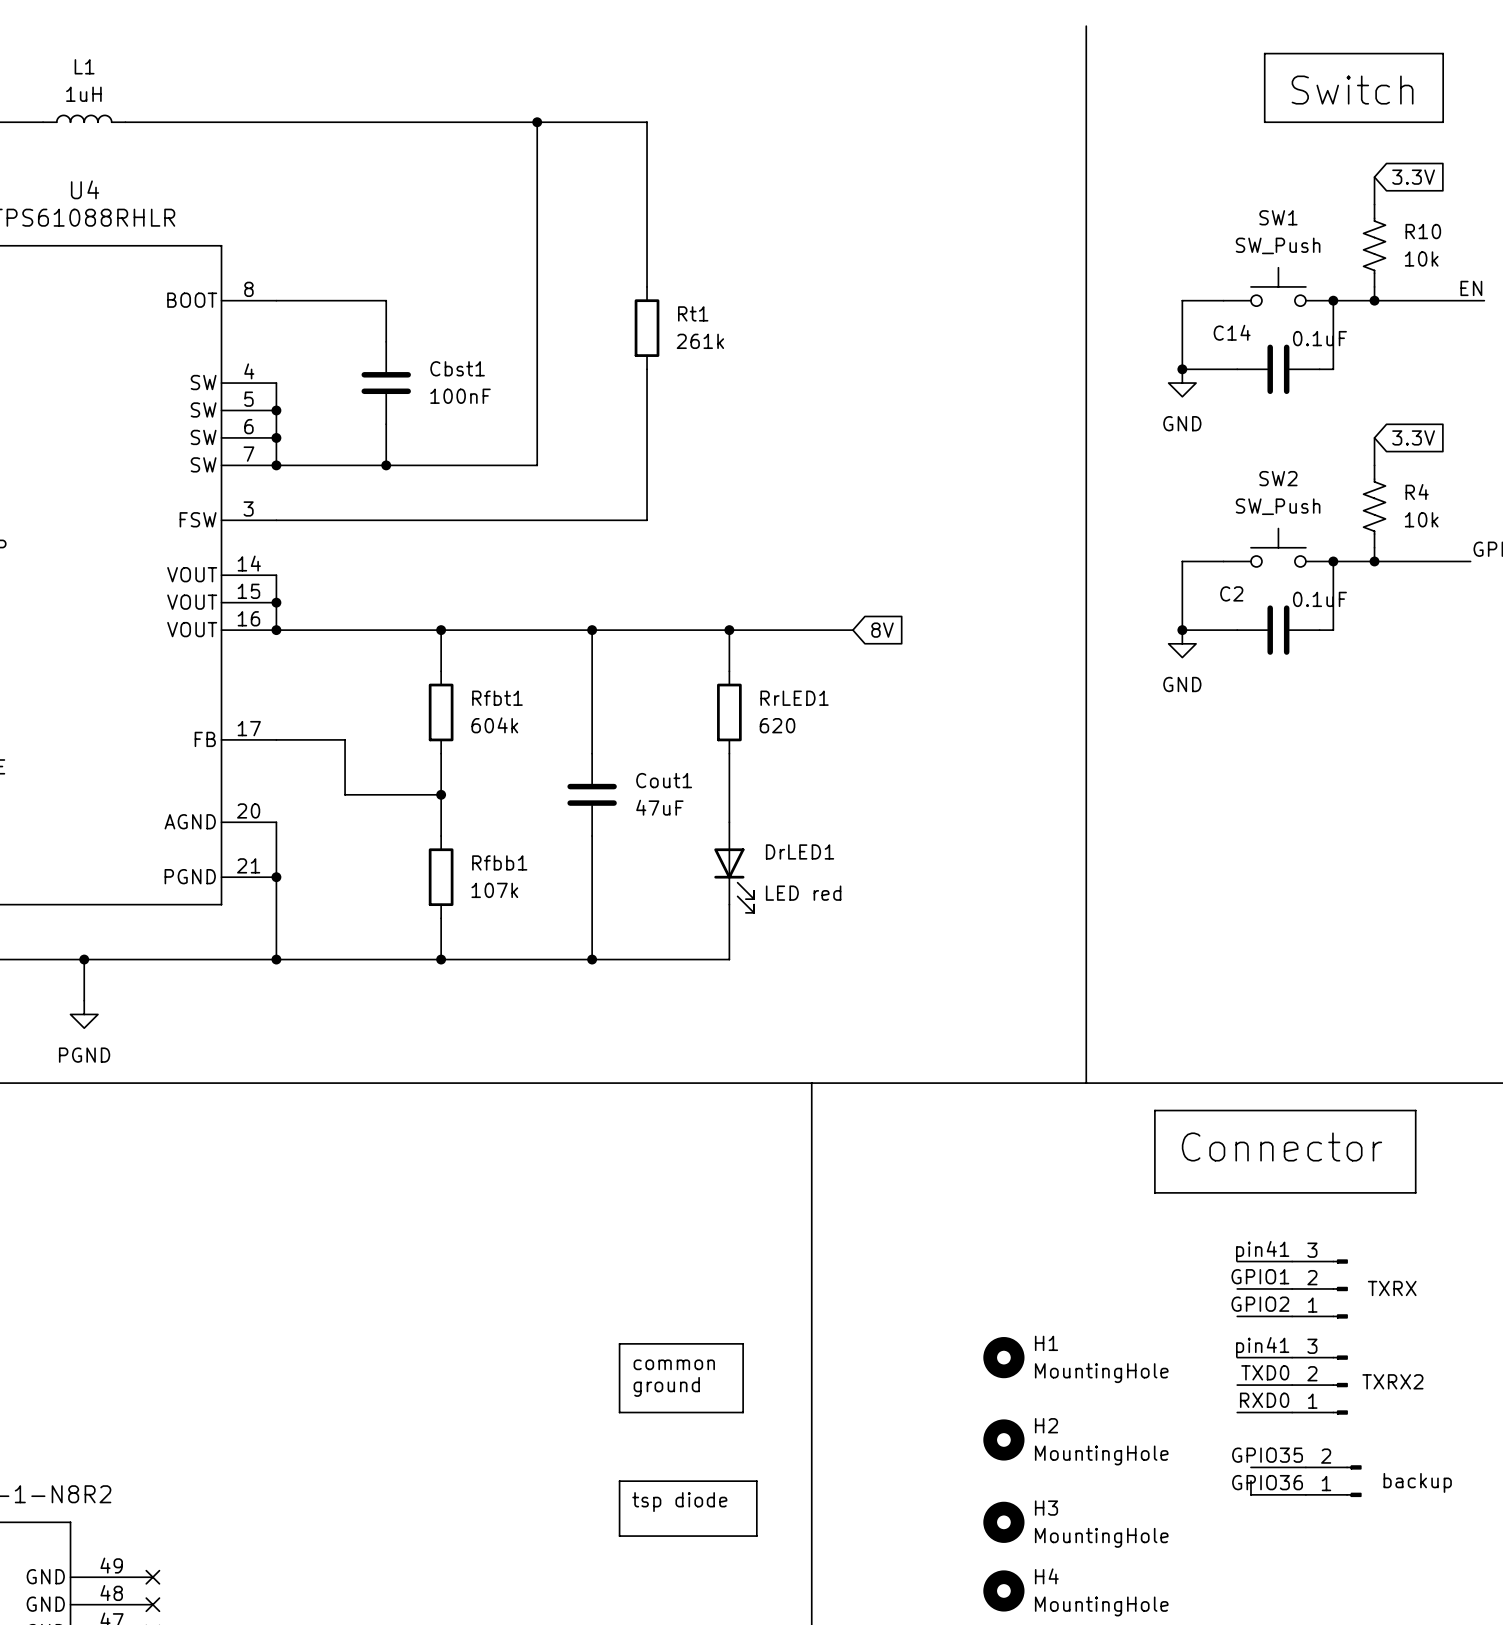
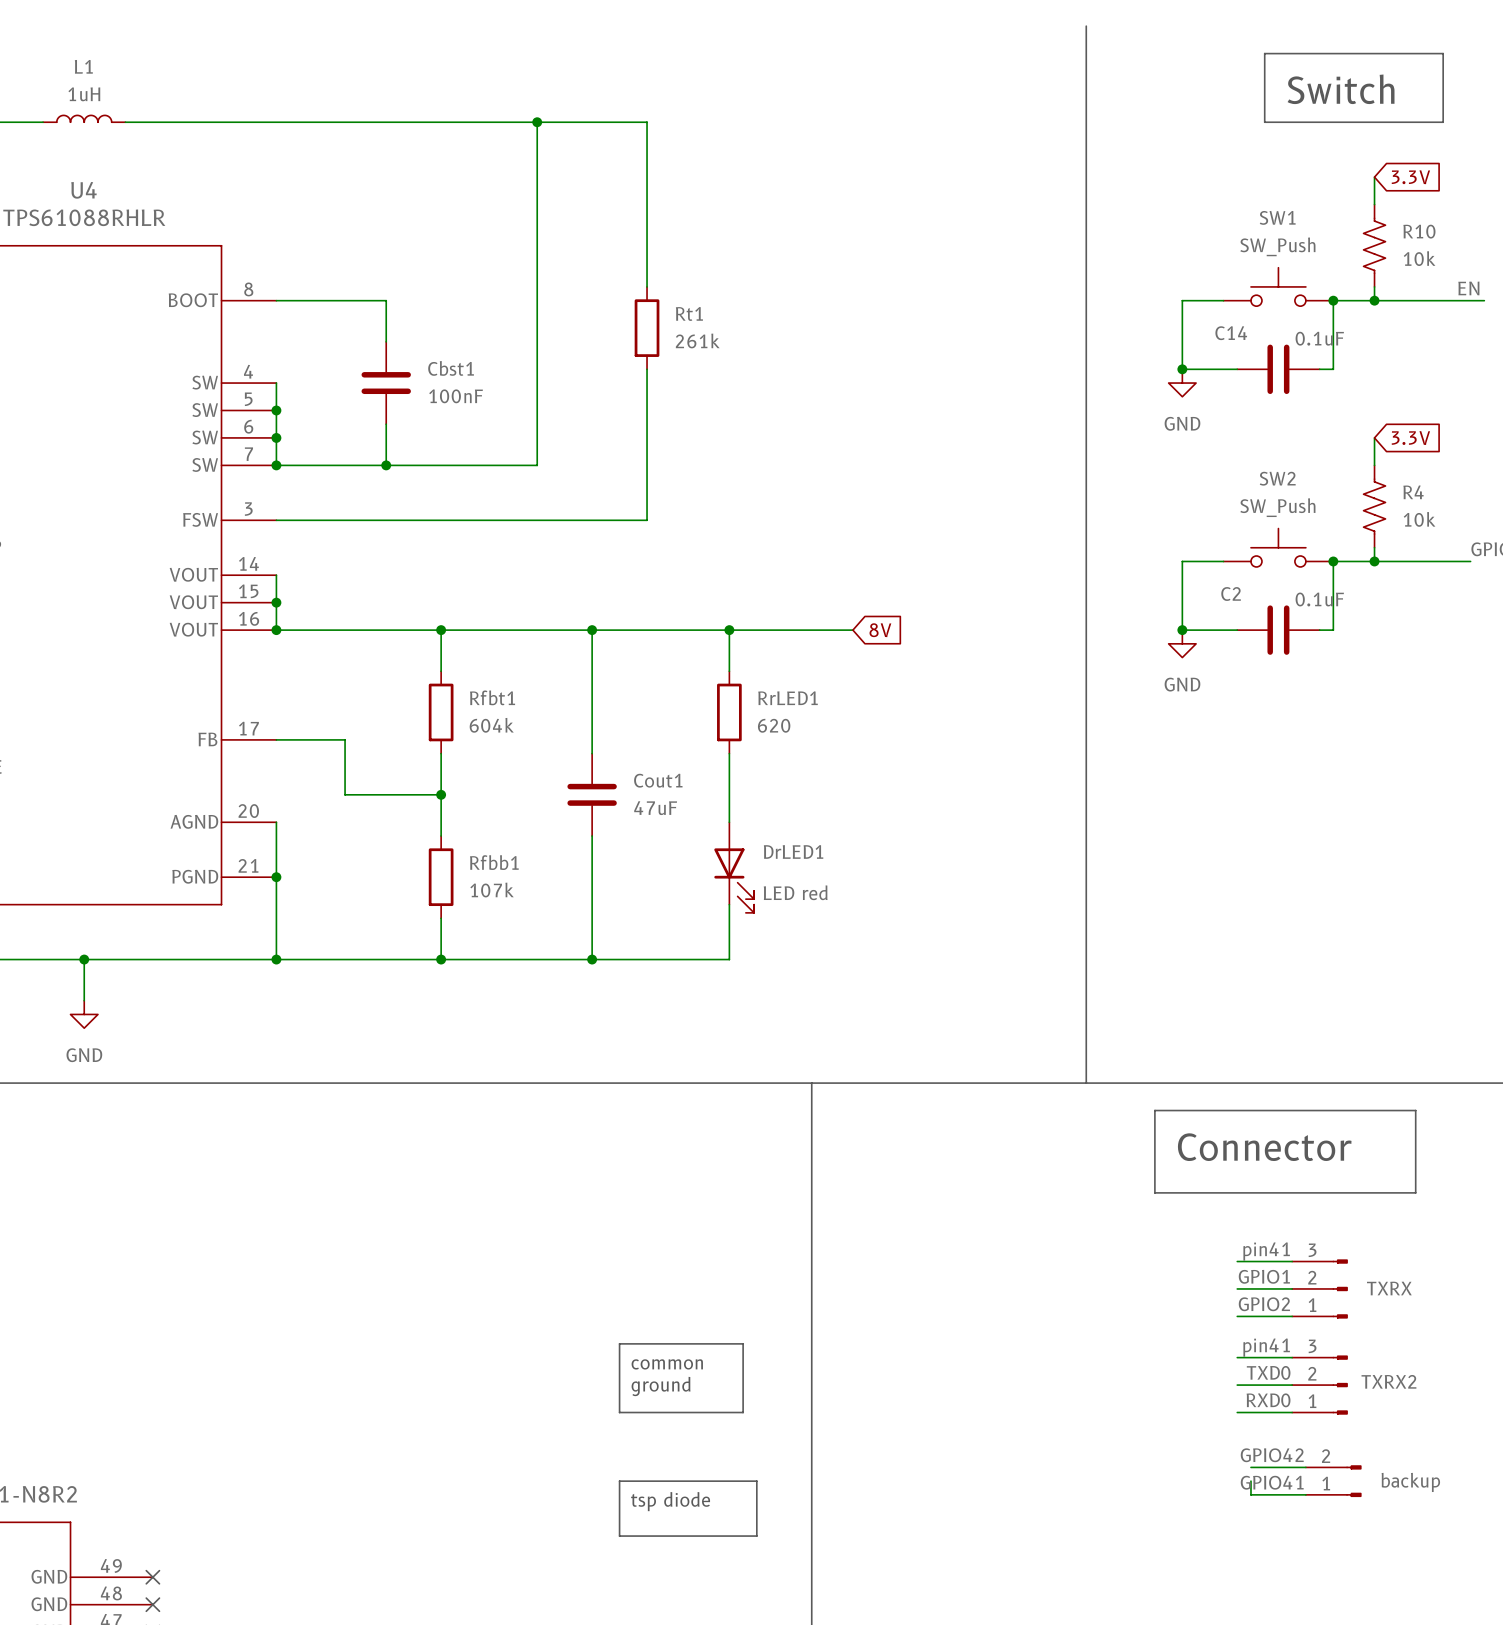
power symbol: PGND (84, 1014) -> GND (84, 1014)
H1: MountingHole (1003, 1357) -> none
H2: MountingHole (1003, 1439) -> none
label: GPIO35 (1267, 1455) -> GPIO42 (1272, 1455)
label: GPIO36 (1267, 1482) -> GPIO41 (1272, 1482)
H3: MountingHole (1003, 1522) -> none
H4: MountingHole (1003, 1590) -> none

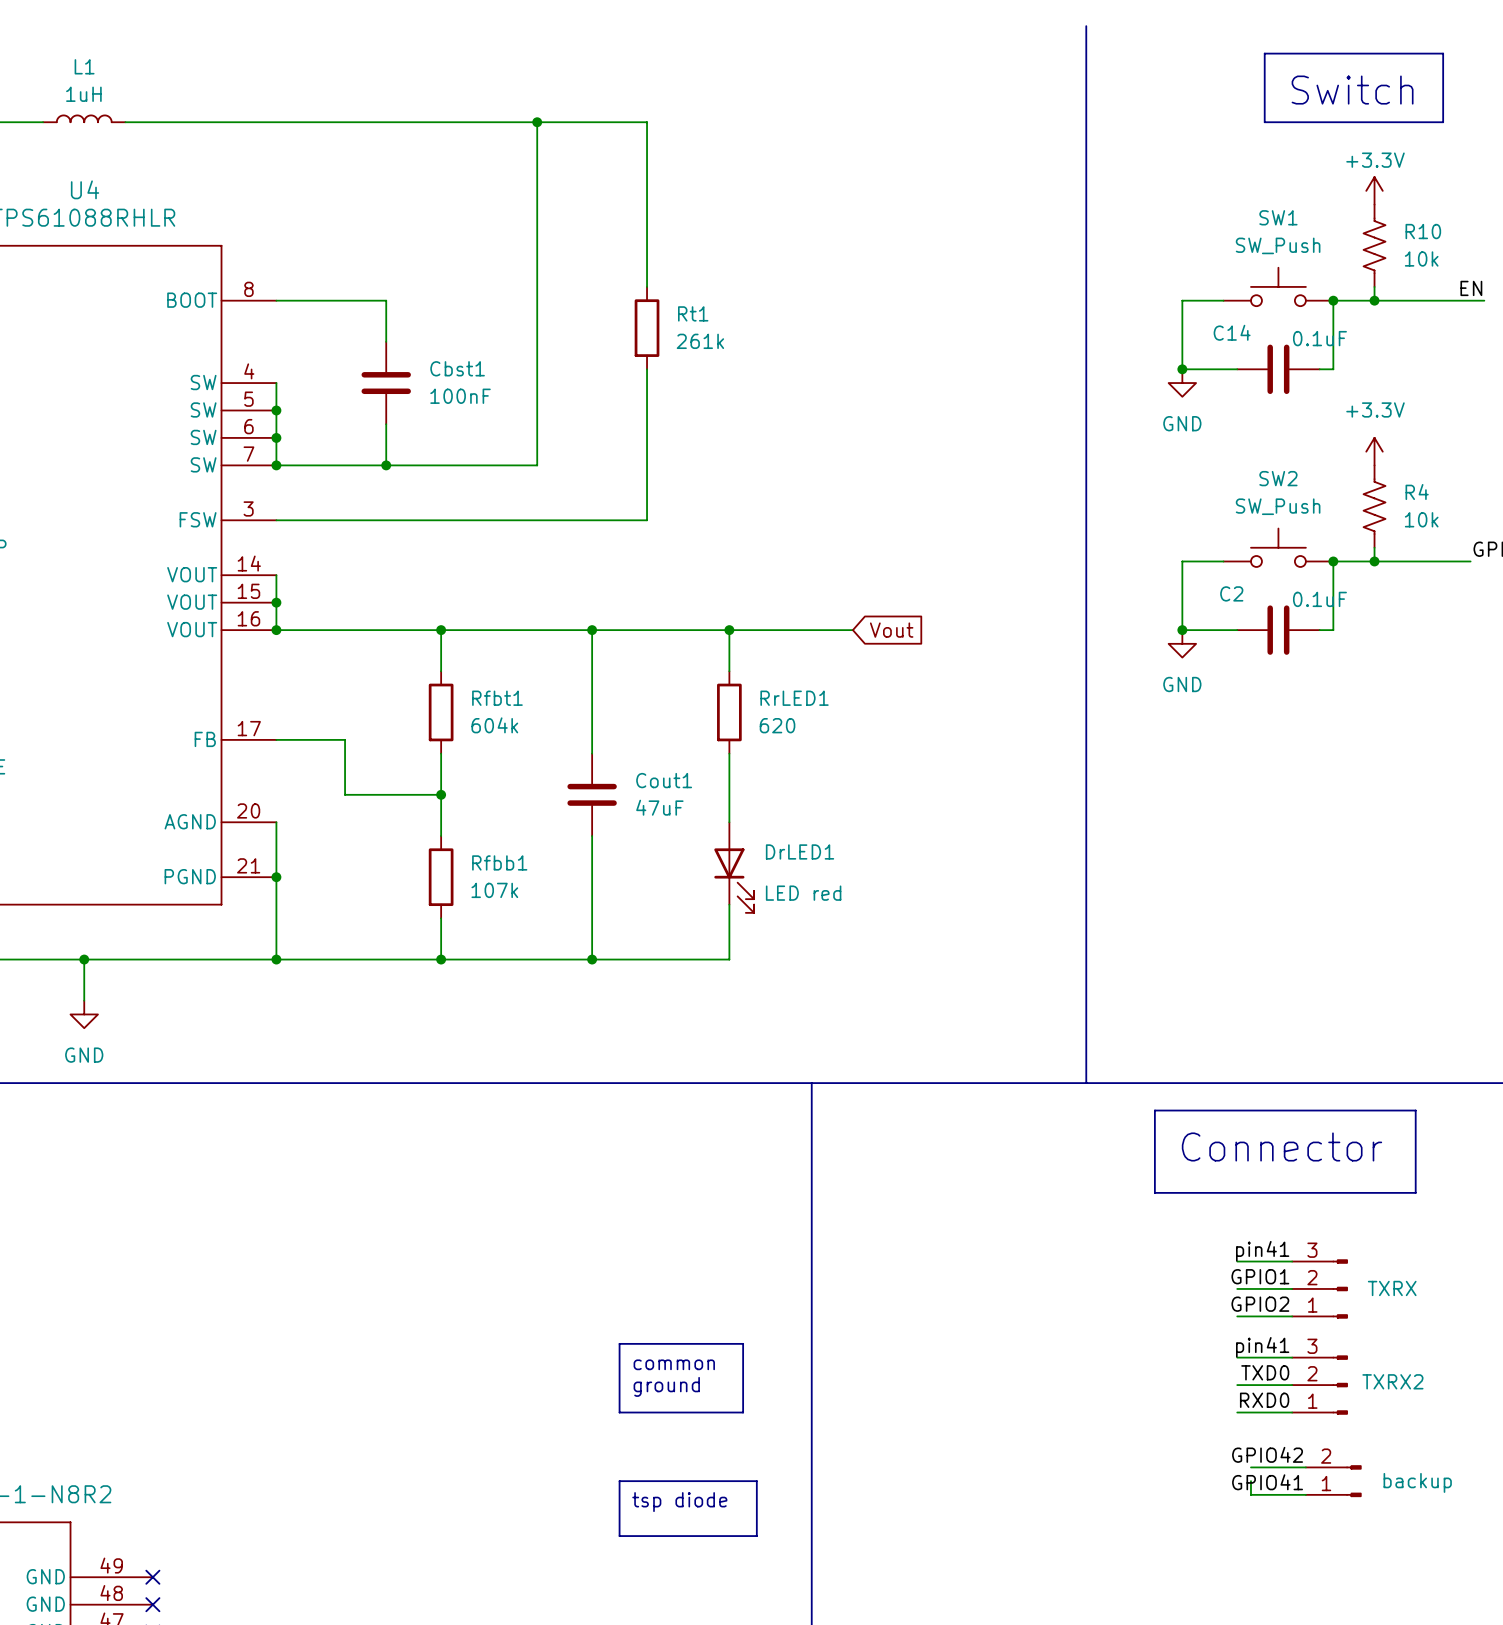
global label: 3.3V (1410, 177) -> none
power symbol: none -> +3.3V (1374, 190)
global label: 3.3V (1410, 438) -> none
power symbol: none -> +3.3V (1374, 451)
global label: 8V (880, 630) -> Vout (891, 630)

